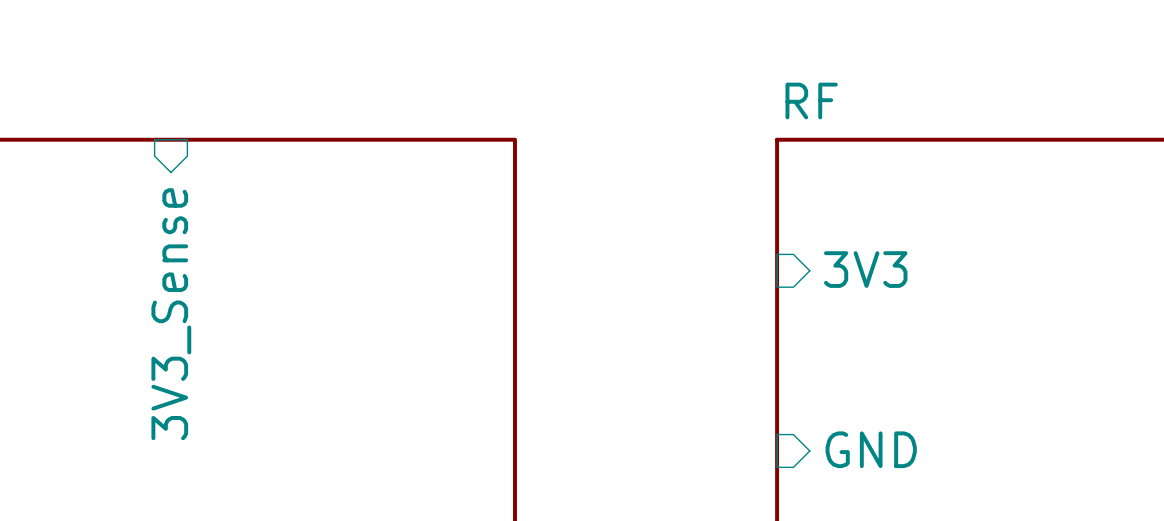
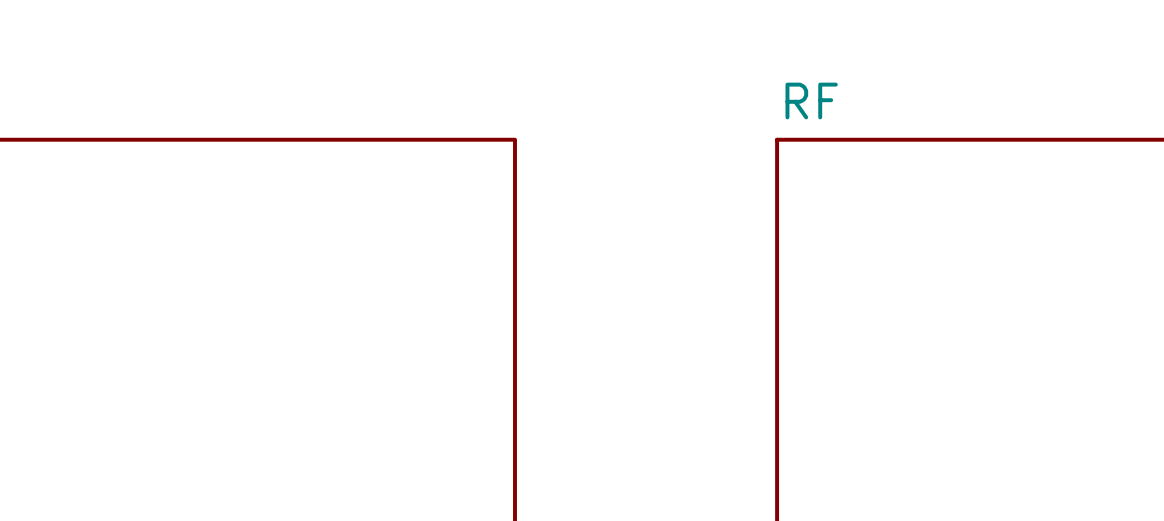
sheet pin: 3V3 (865, 269) -> none
sheet pin: 3V3_Sense (171, 314) -> none
sheet pin: GND (871, 449) -> none

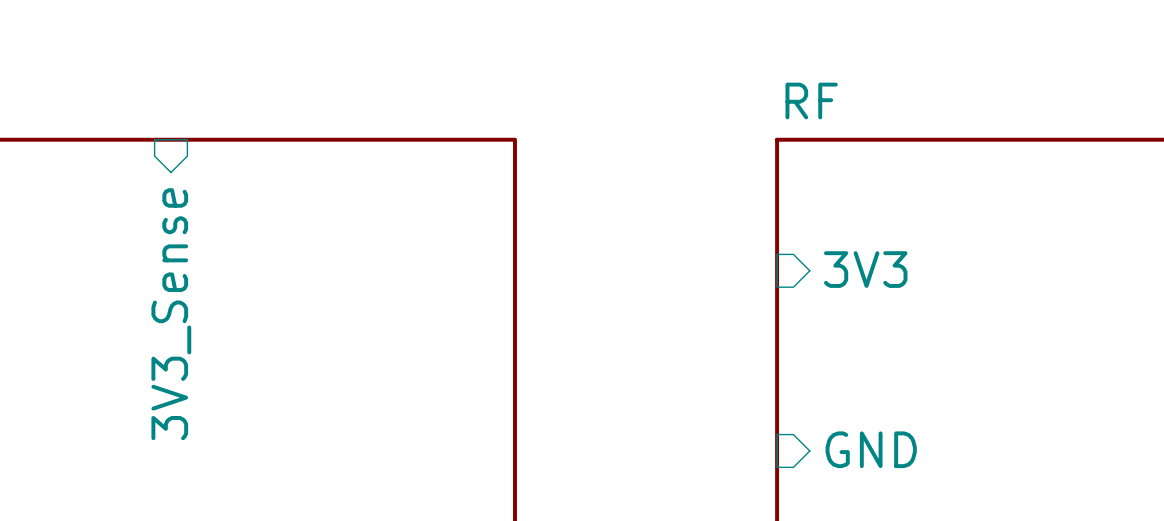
sheet pin: none -> 3V3 (865, 269)
sheet pin: none -> 3V3_Sense (171, 314)
sheet pin: none -> GND (871, 449)

